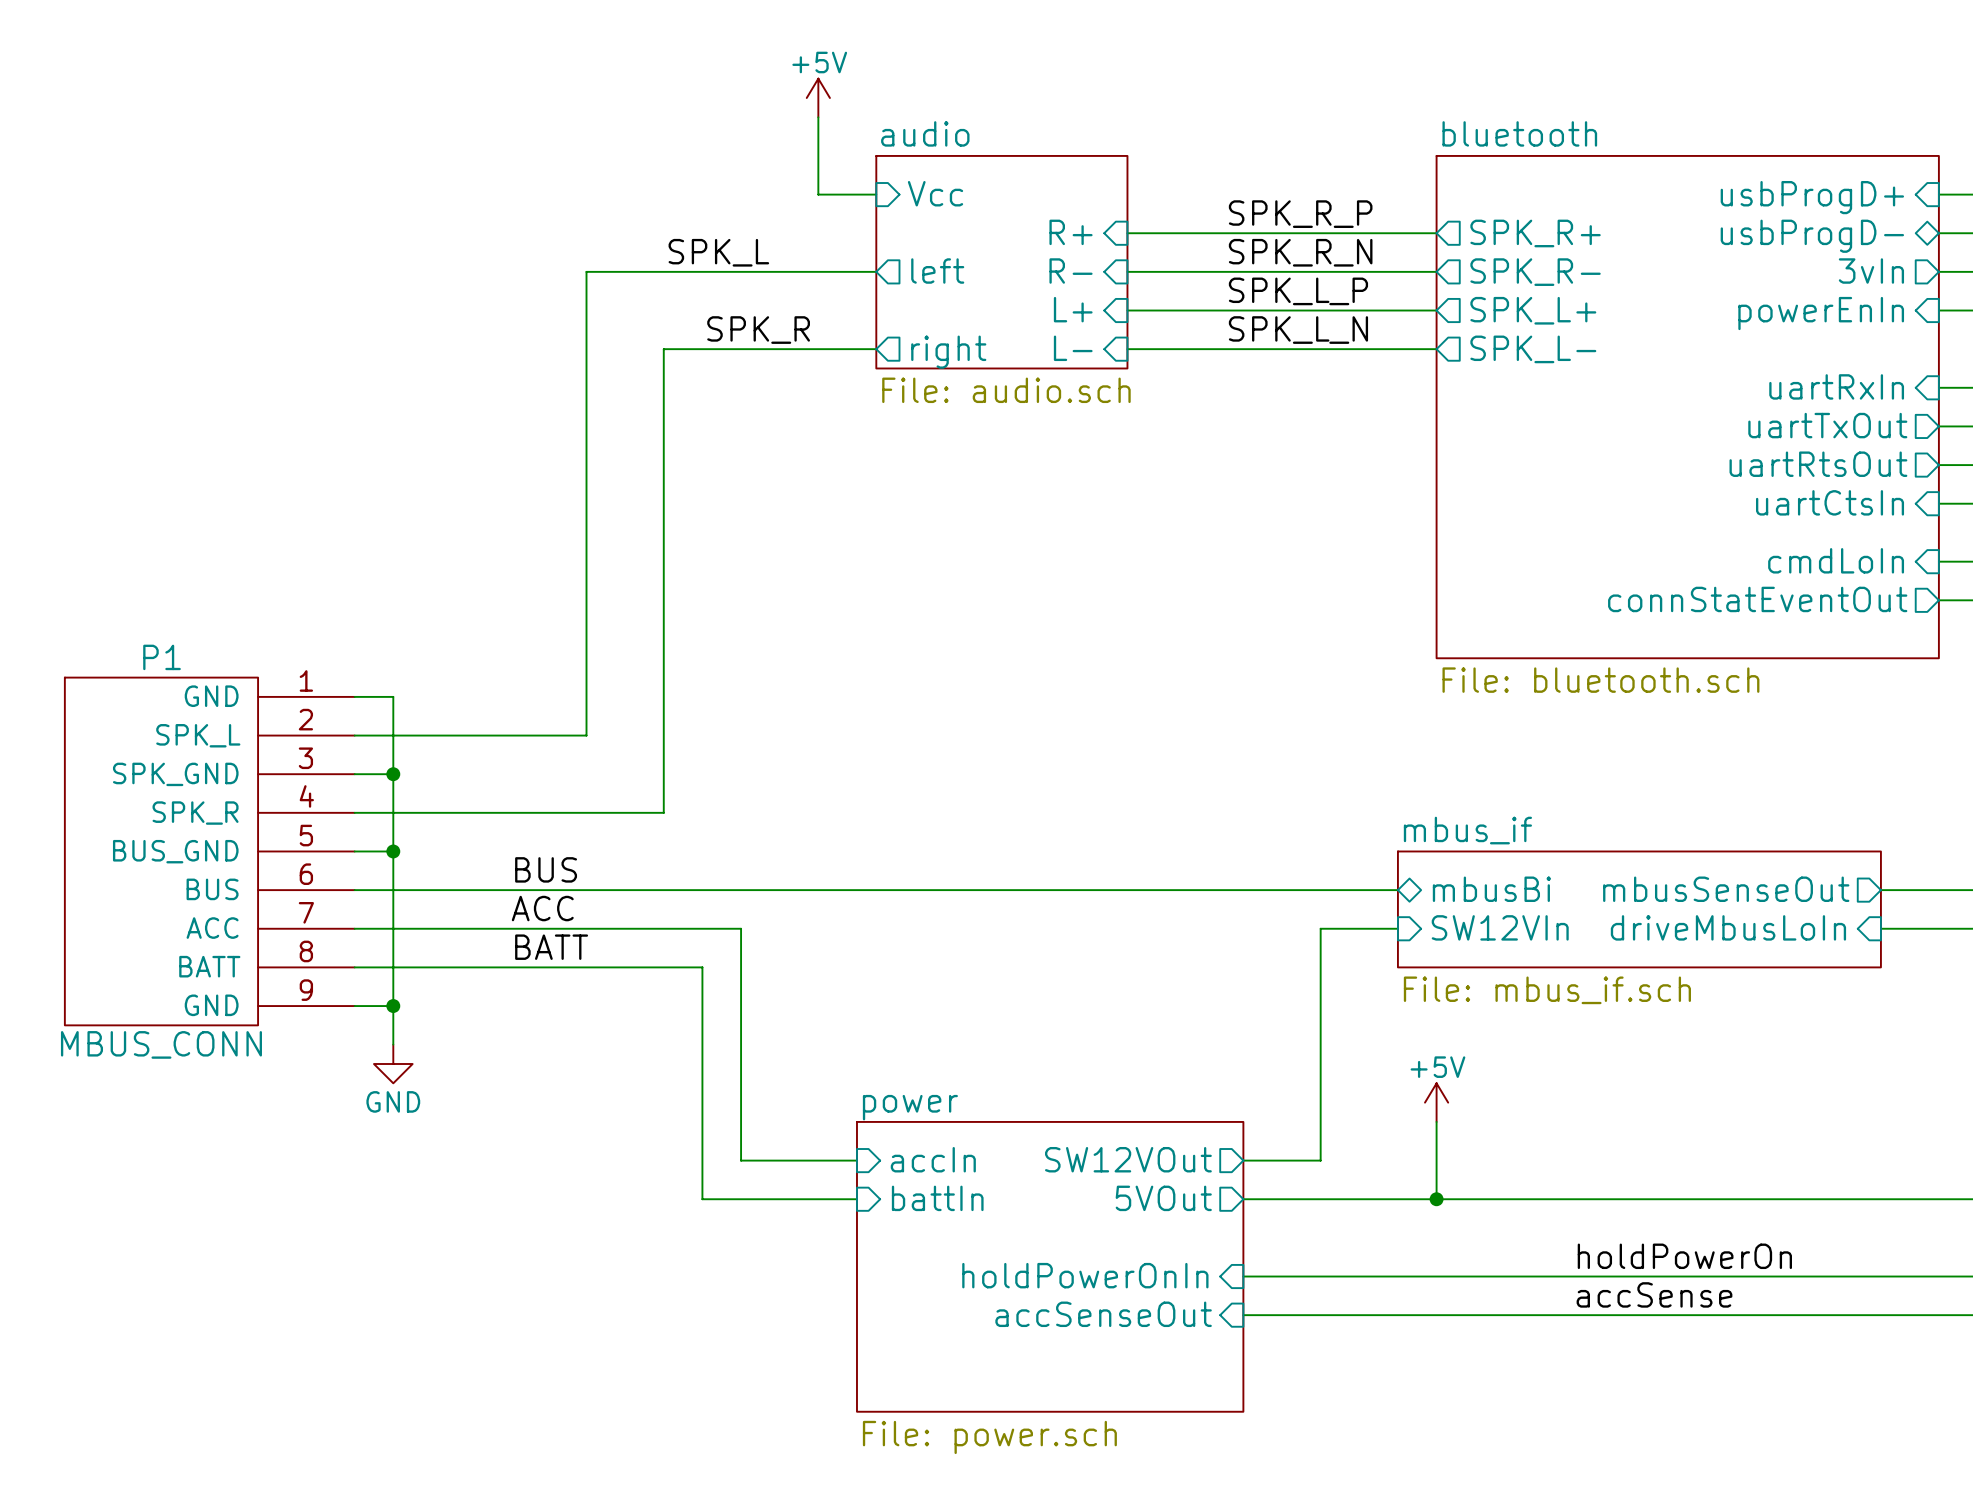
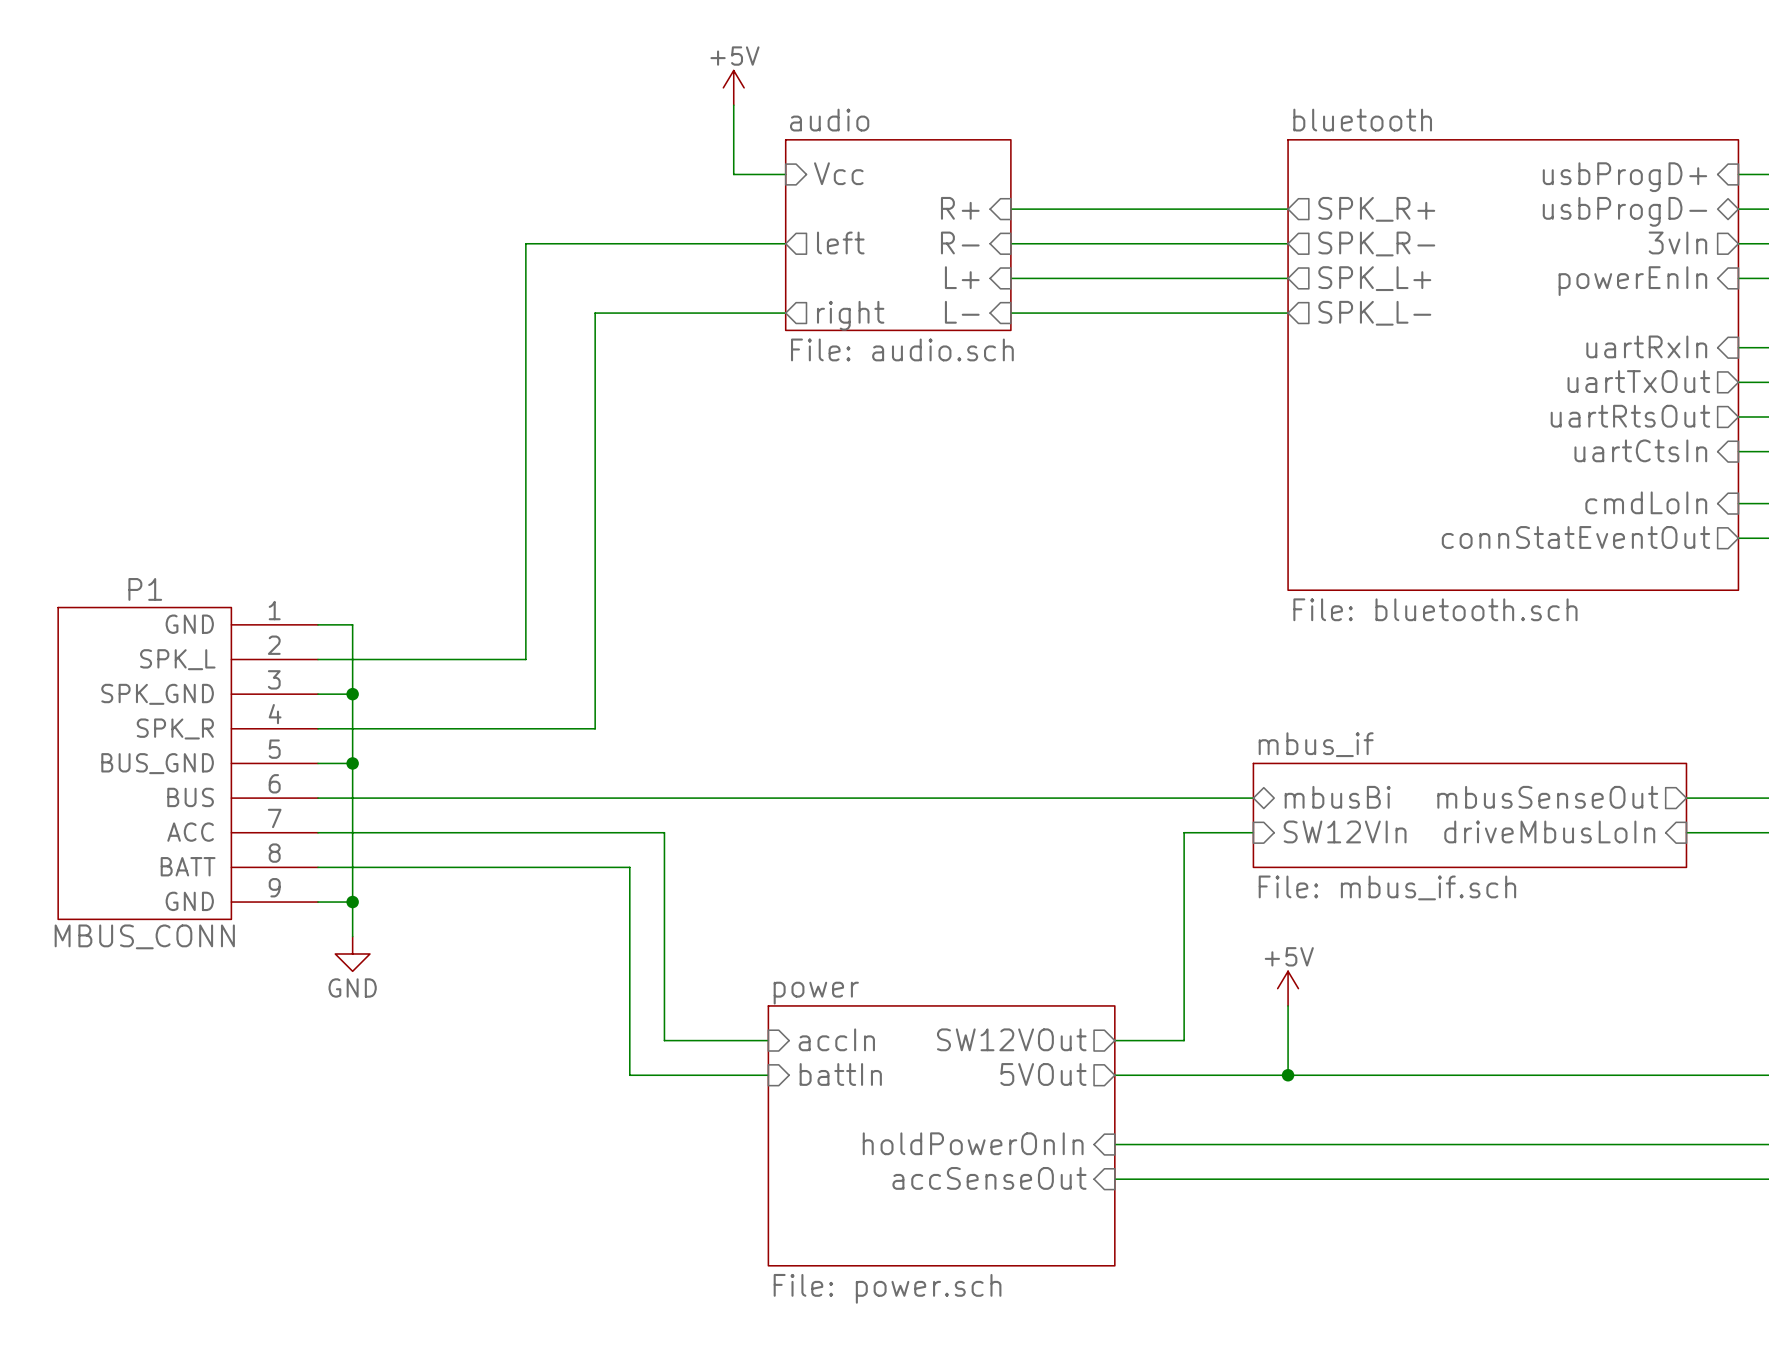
label: SPK_R_P (1300, 214) -> none
label: SPK_L (718, 252) -> none
label: SPK_R_N (1300, 252) -> none
label: SPK_L_P (1298, 291) -> none
label: SPK_R (758, 330) -> none
label: SPK_L_N (1298, 330) -> none
label: BUS (546, 869) -> none
label: ACC (542, 908) -> none
label: BATT (551, 947) -> none
label: holdPowerOn (1684, 1256) -> none
label: accSense (1654, 1294) -> none

